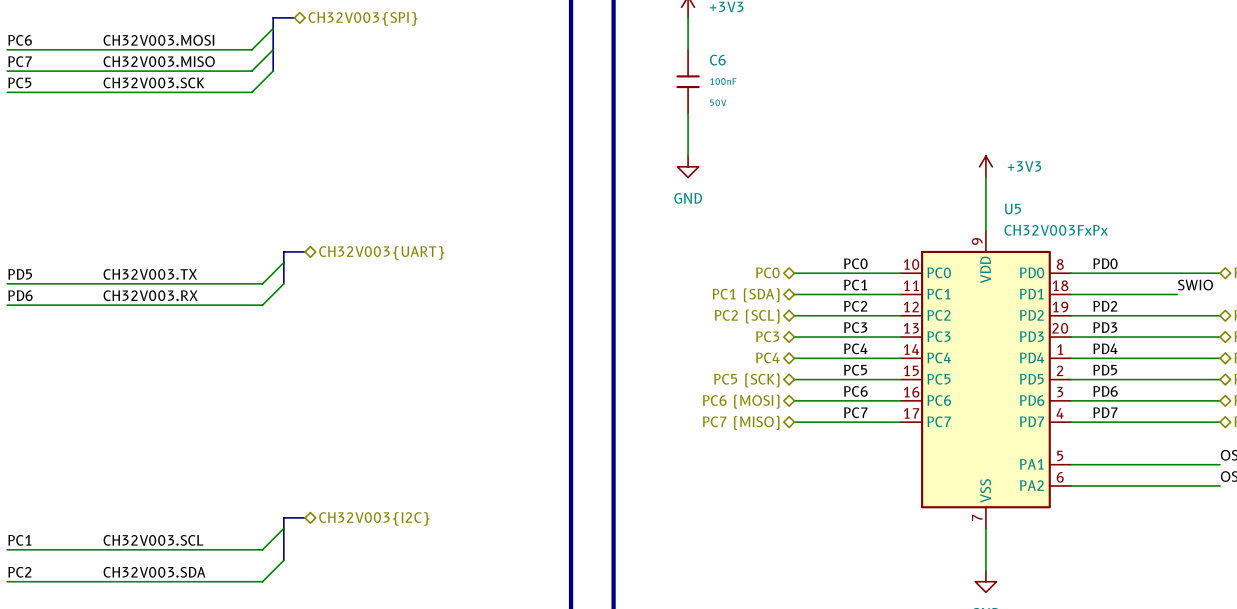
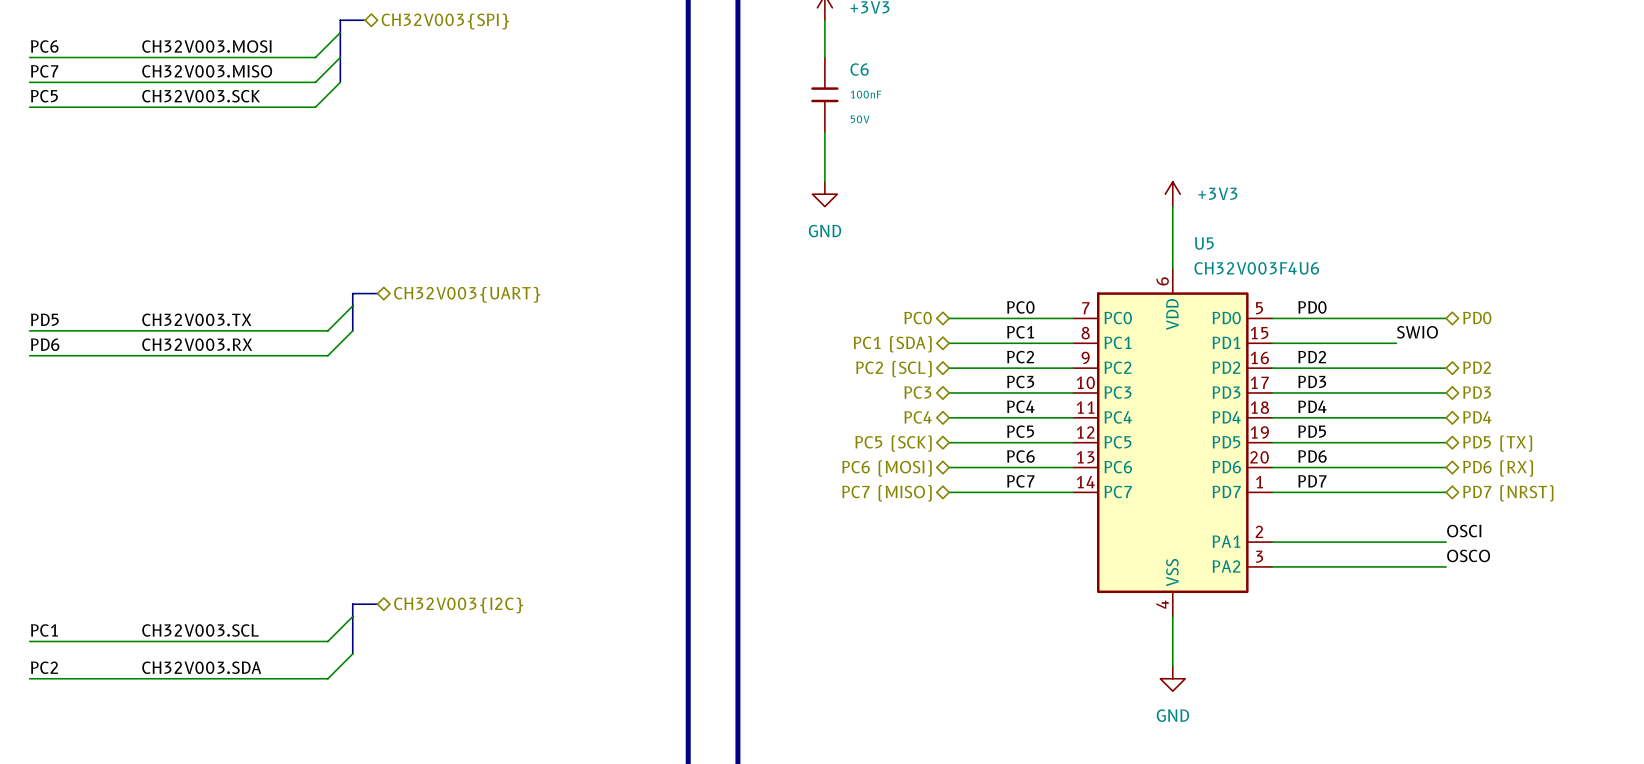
U5 symbol: [900, 230, 1072, 529] -> [1073, 268, 1273, 617]
U5 value: CH32V003FxPx (1056, 230) -> CH32V003F4U6 (1256, 268)

